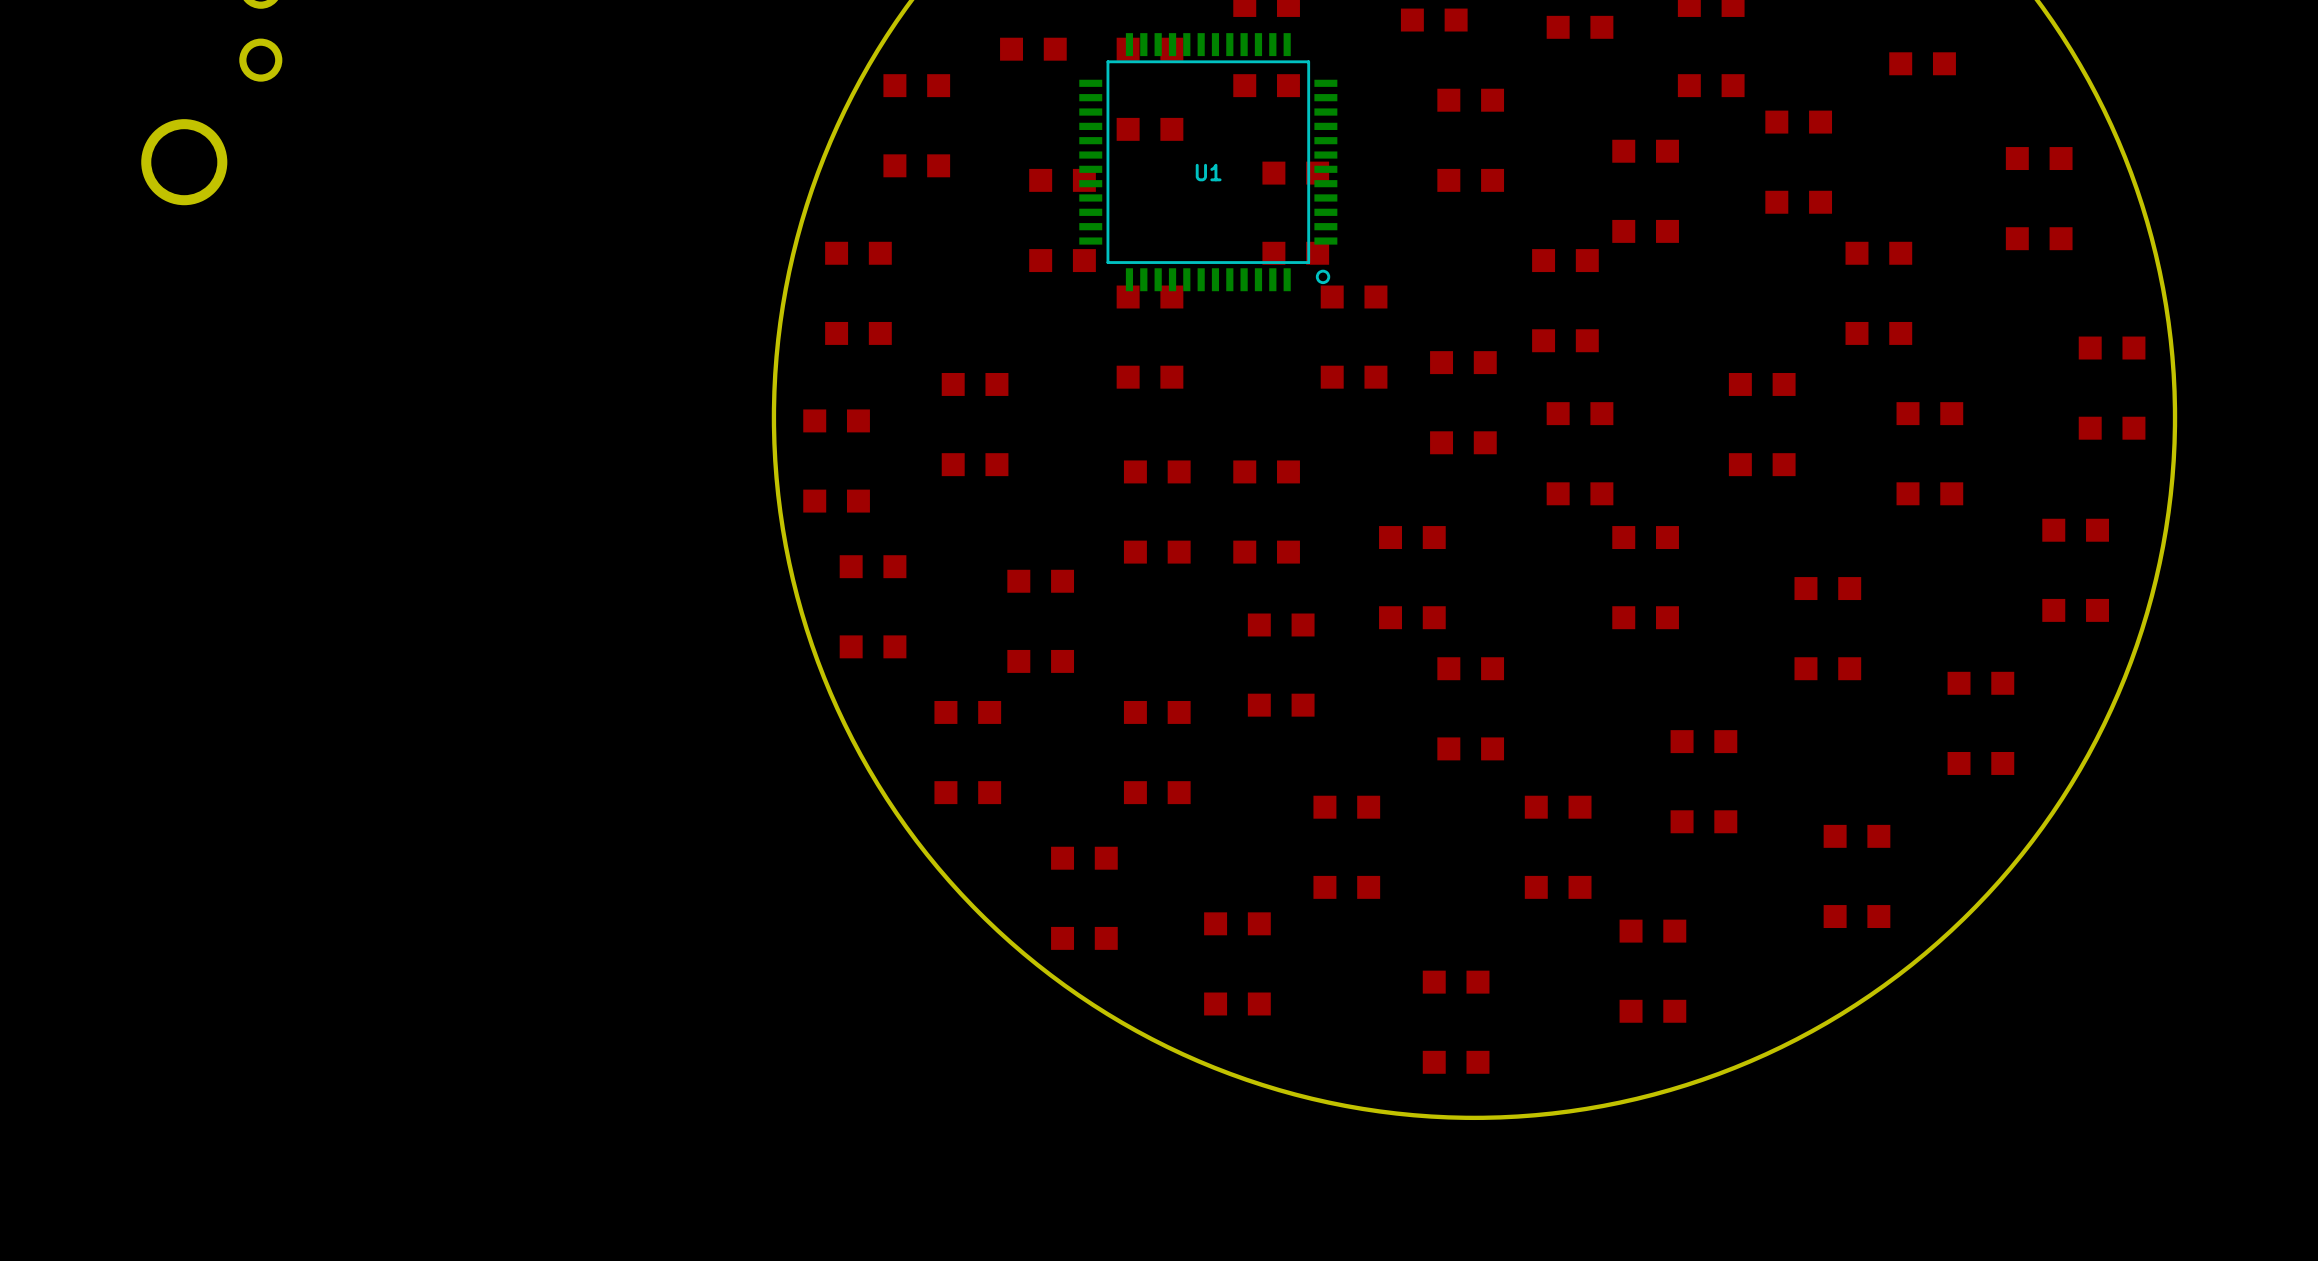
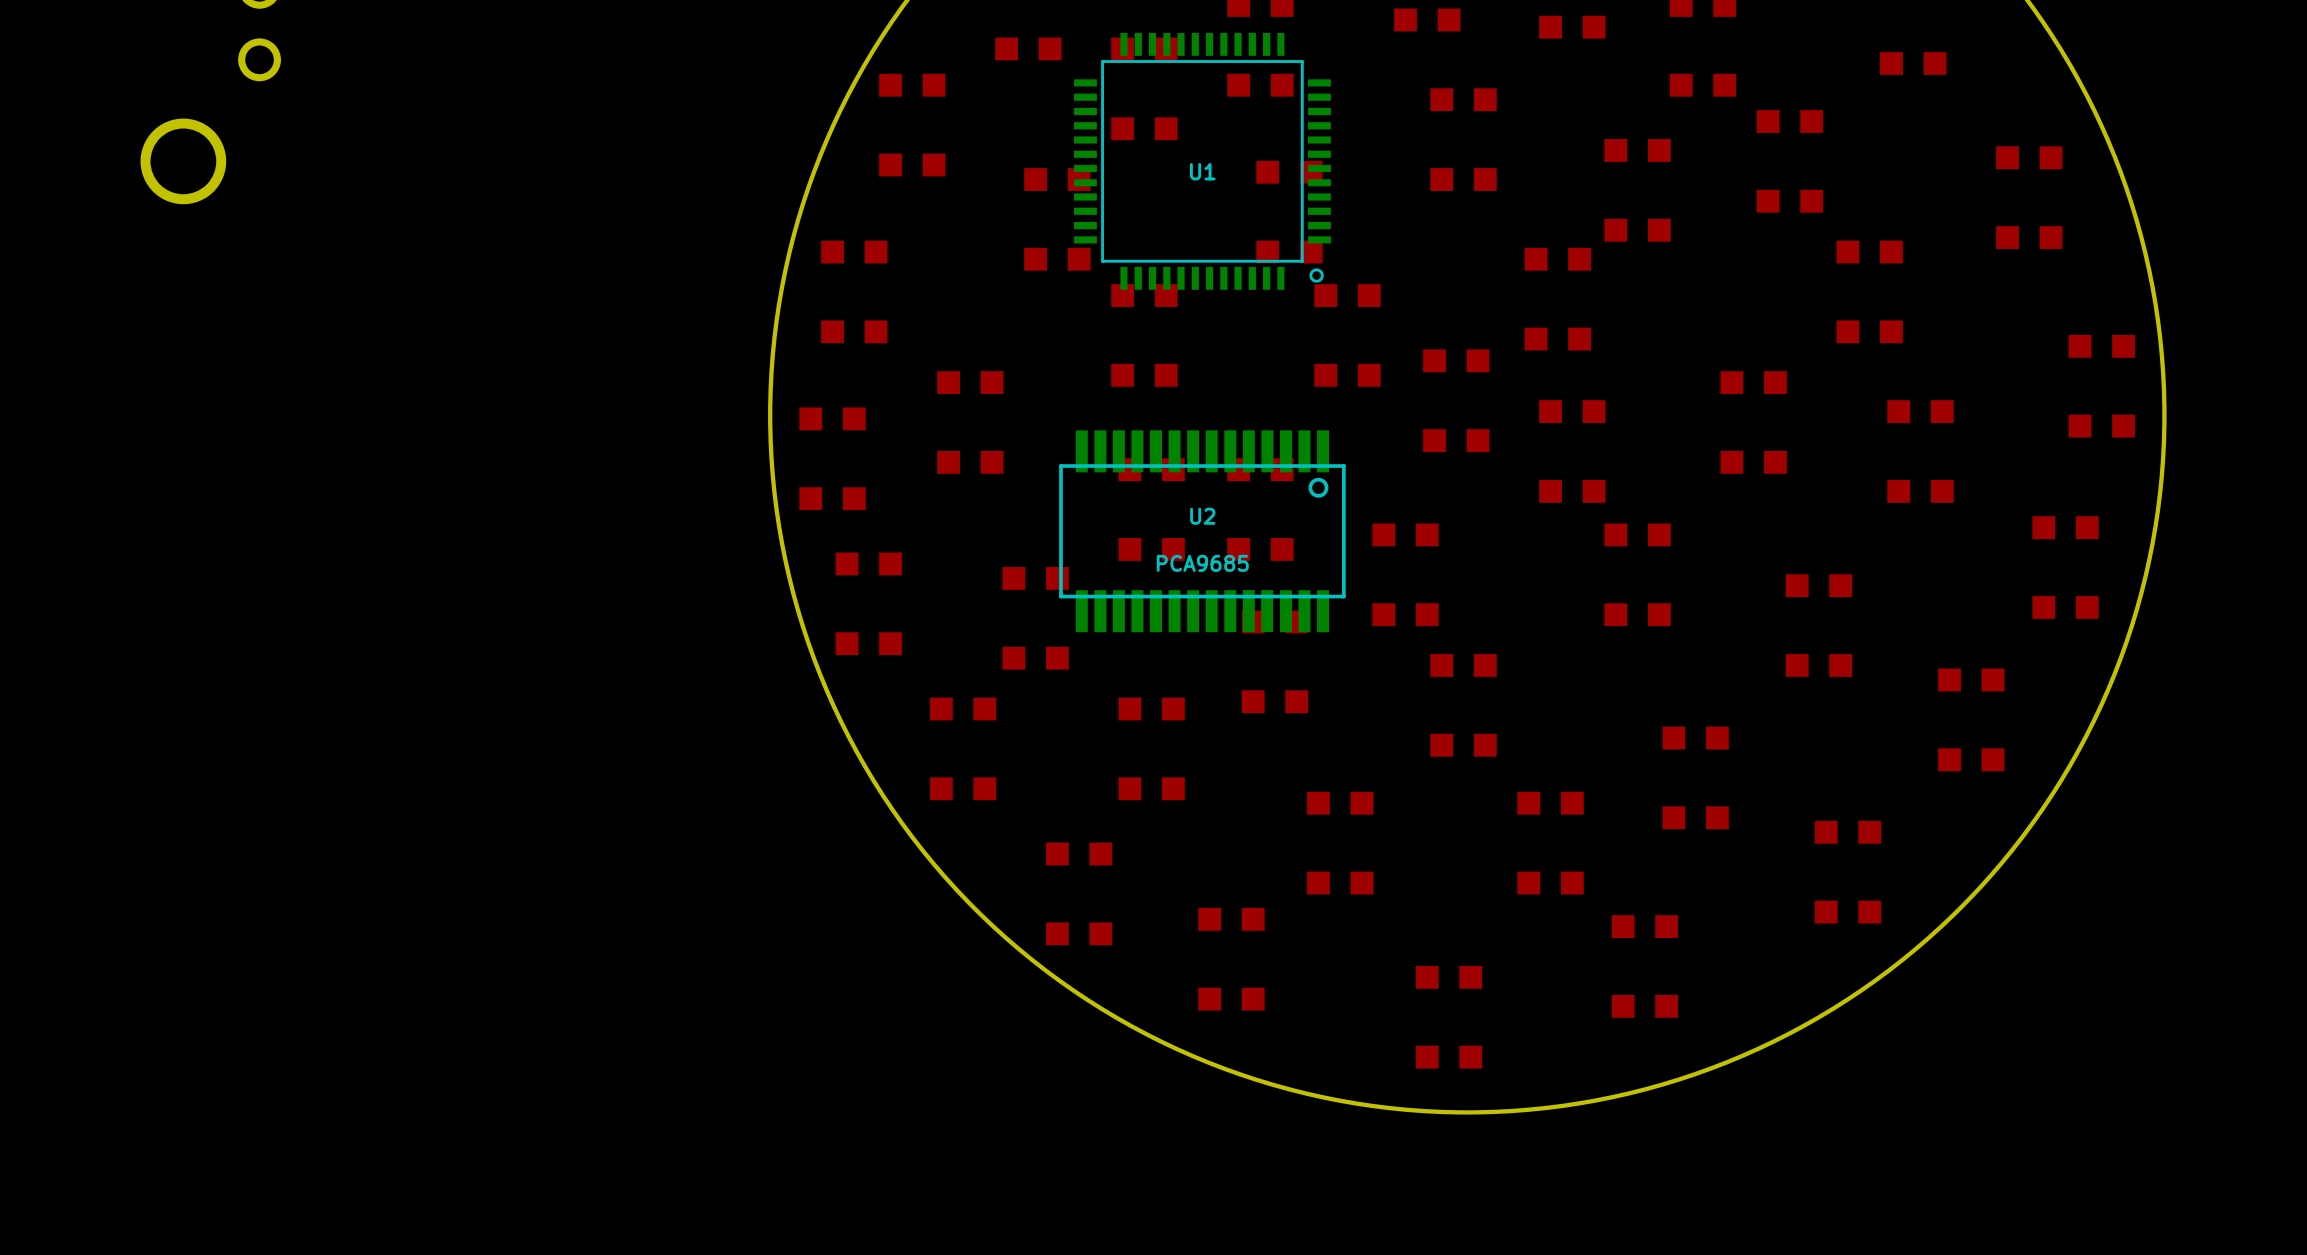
U2: none -> PCA9685 (1202, 531)

